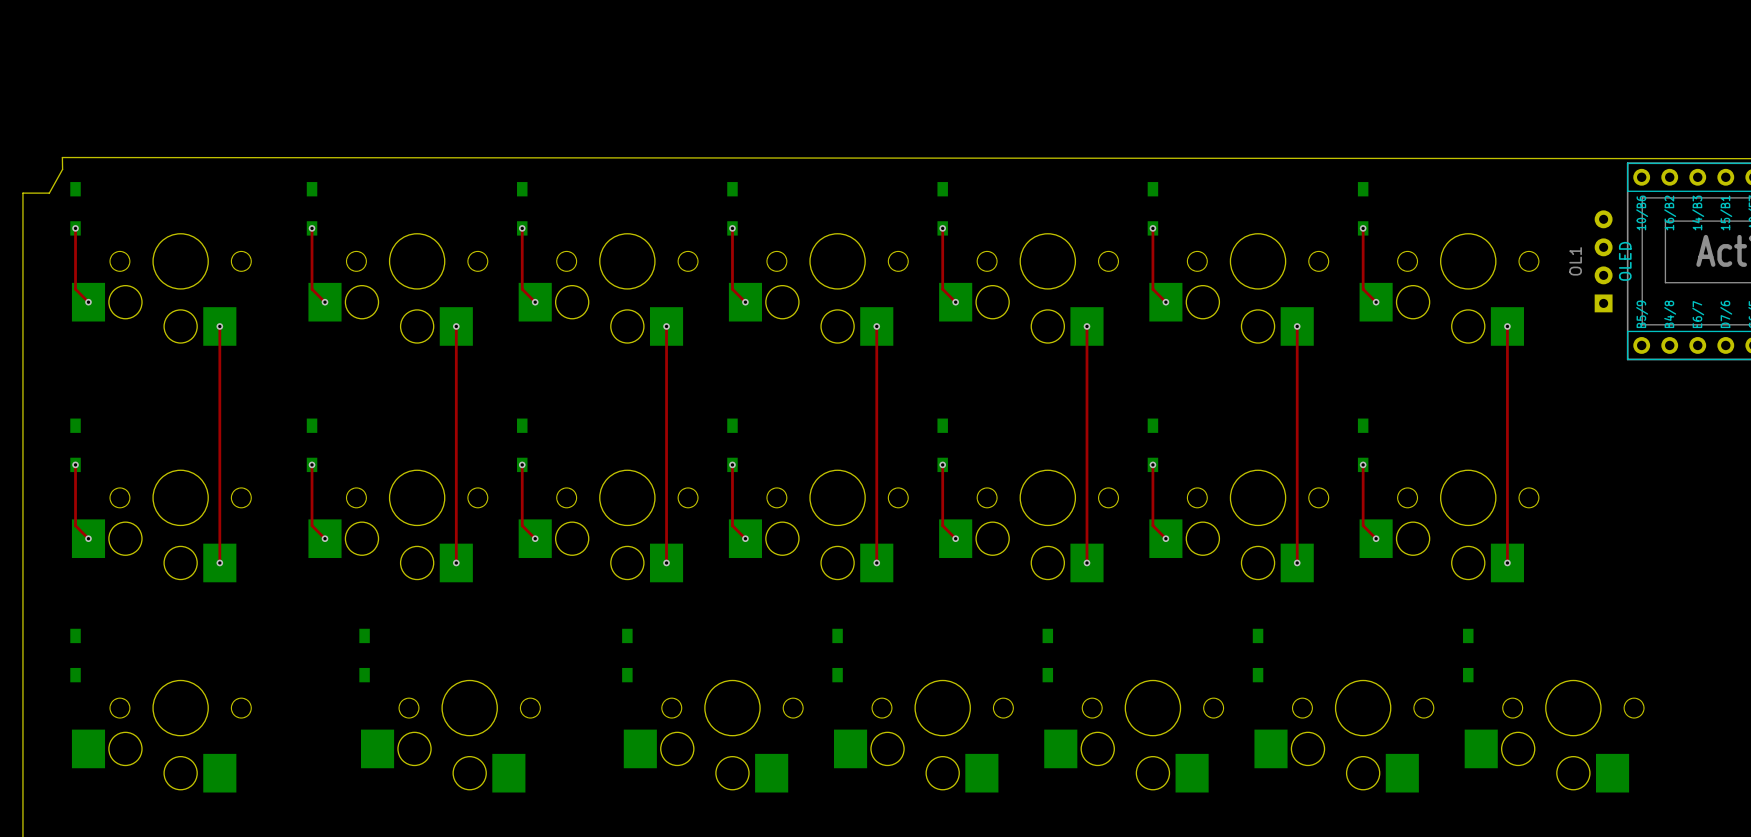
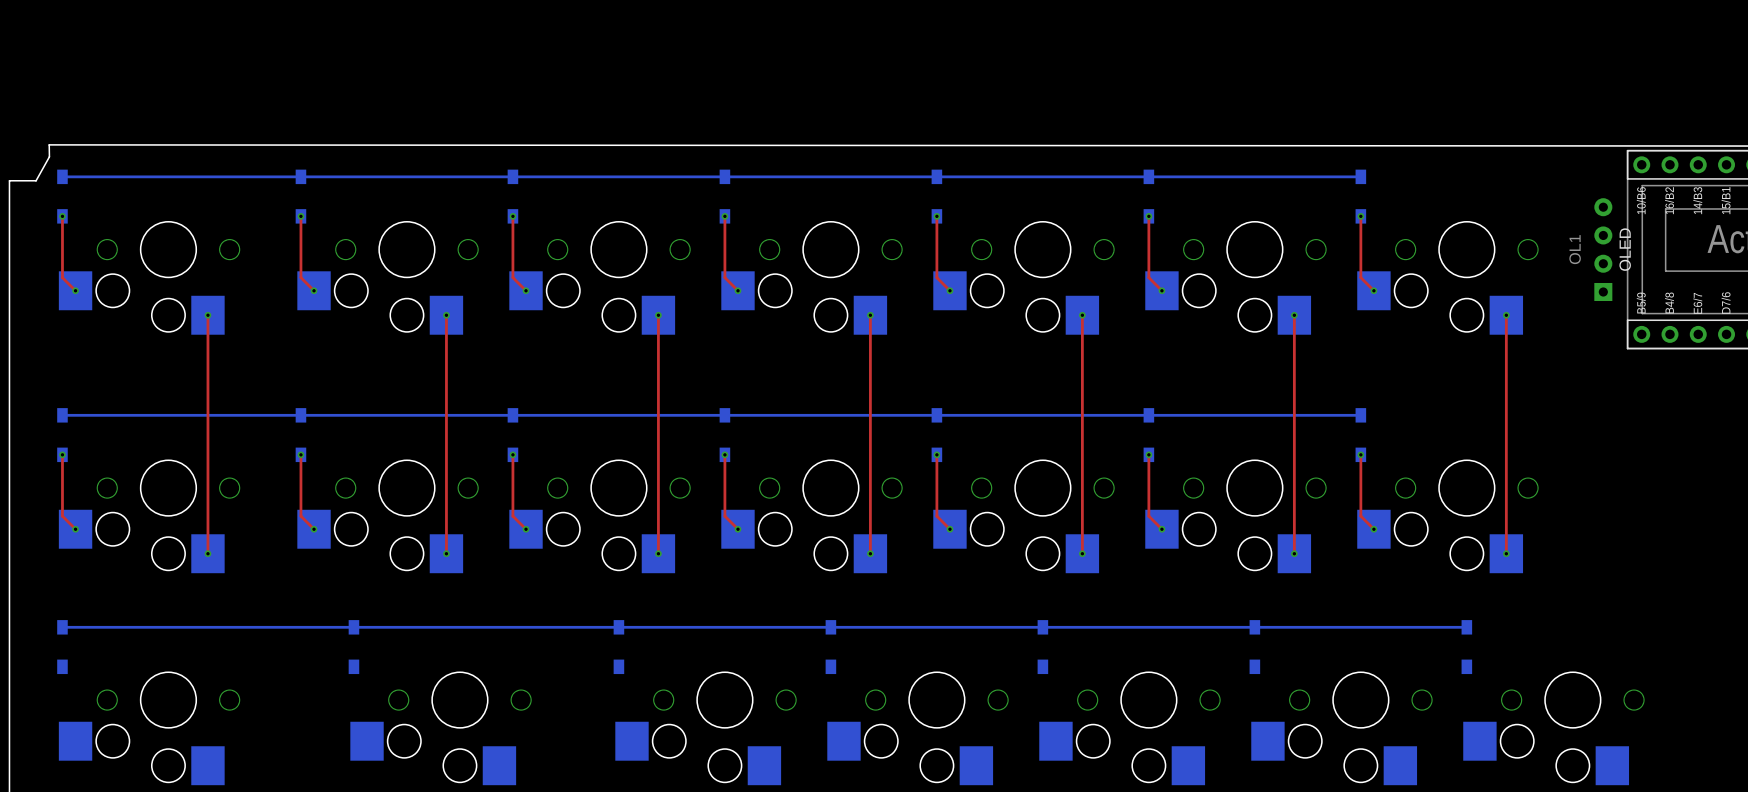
bottom track: none -> (62, 176) (1360, 176)
bottom track: none -> (62, 415) (1360, 415)
bottom track: none -> (62, 627) (1466, 627)

